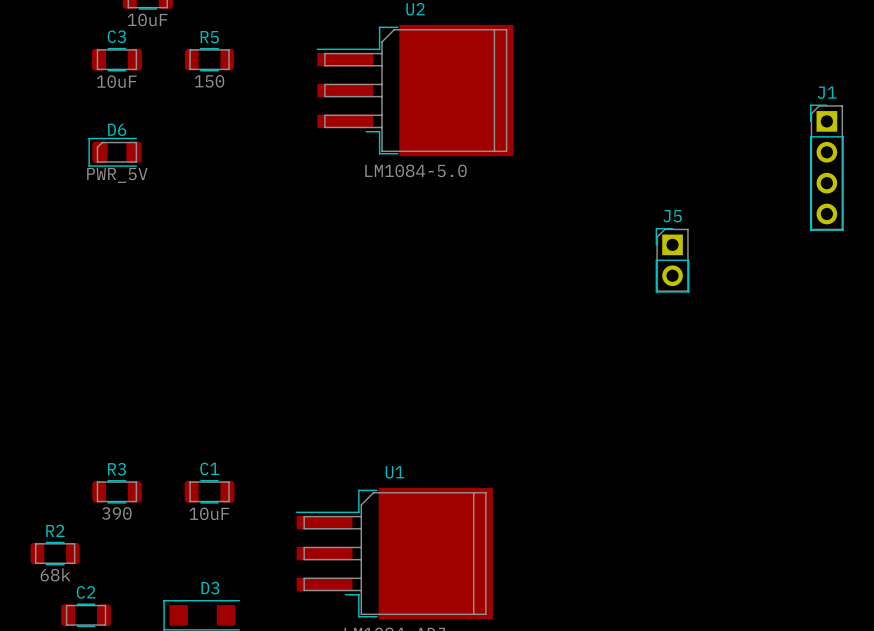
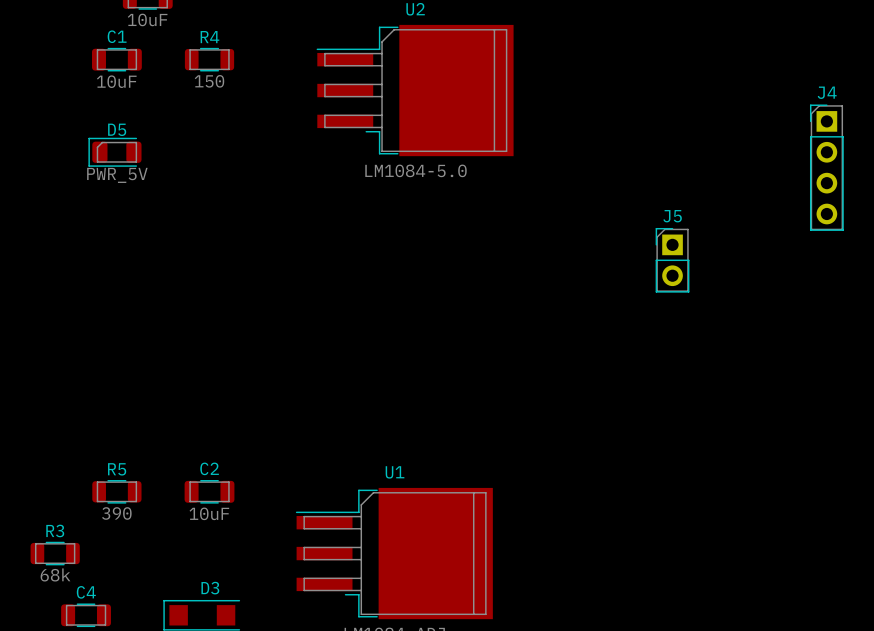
C3 name: C3 (116, 36) -> C1 (117, 36)
R5 name: R5 (209, 37) -> R4 (209, 37)
J1 name: J1 (827, 92) -> J4 (827, 92)
D6 name: D6 (117, 129) -> D5 (117, 129)
C1 name: C1 (209, 468) -> C2 (209, 468)
R3 name: R3 (116, 469) -> R5 (117, 469)
R2 name: R2 (55, 530) -> R3 (55, 530)
C2 name: C2 (86, 592) -> C4 (86, 592)

